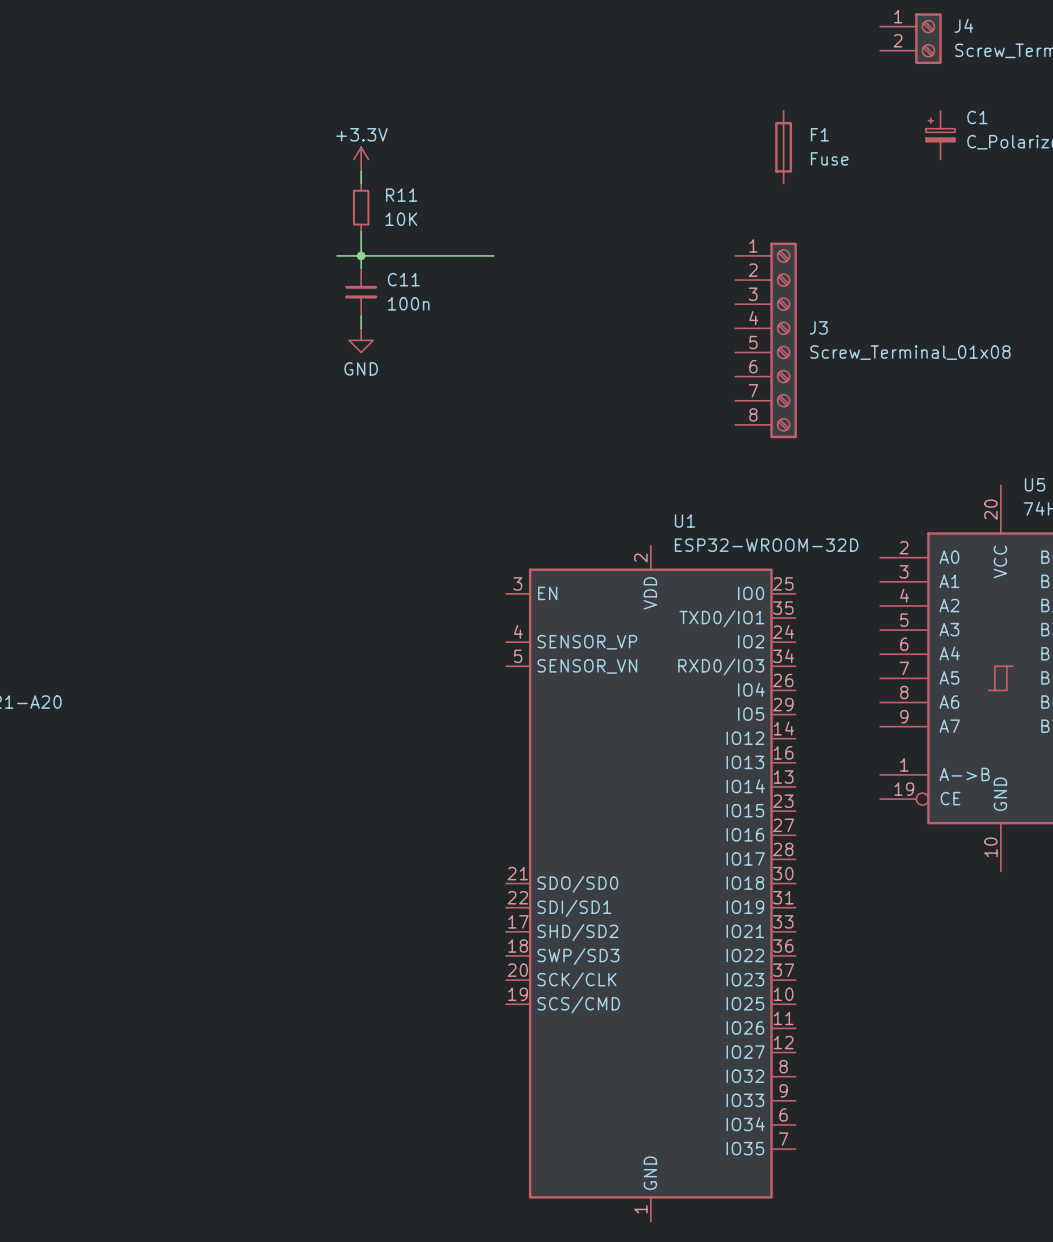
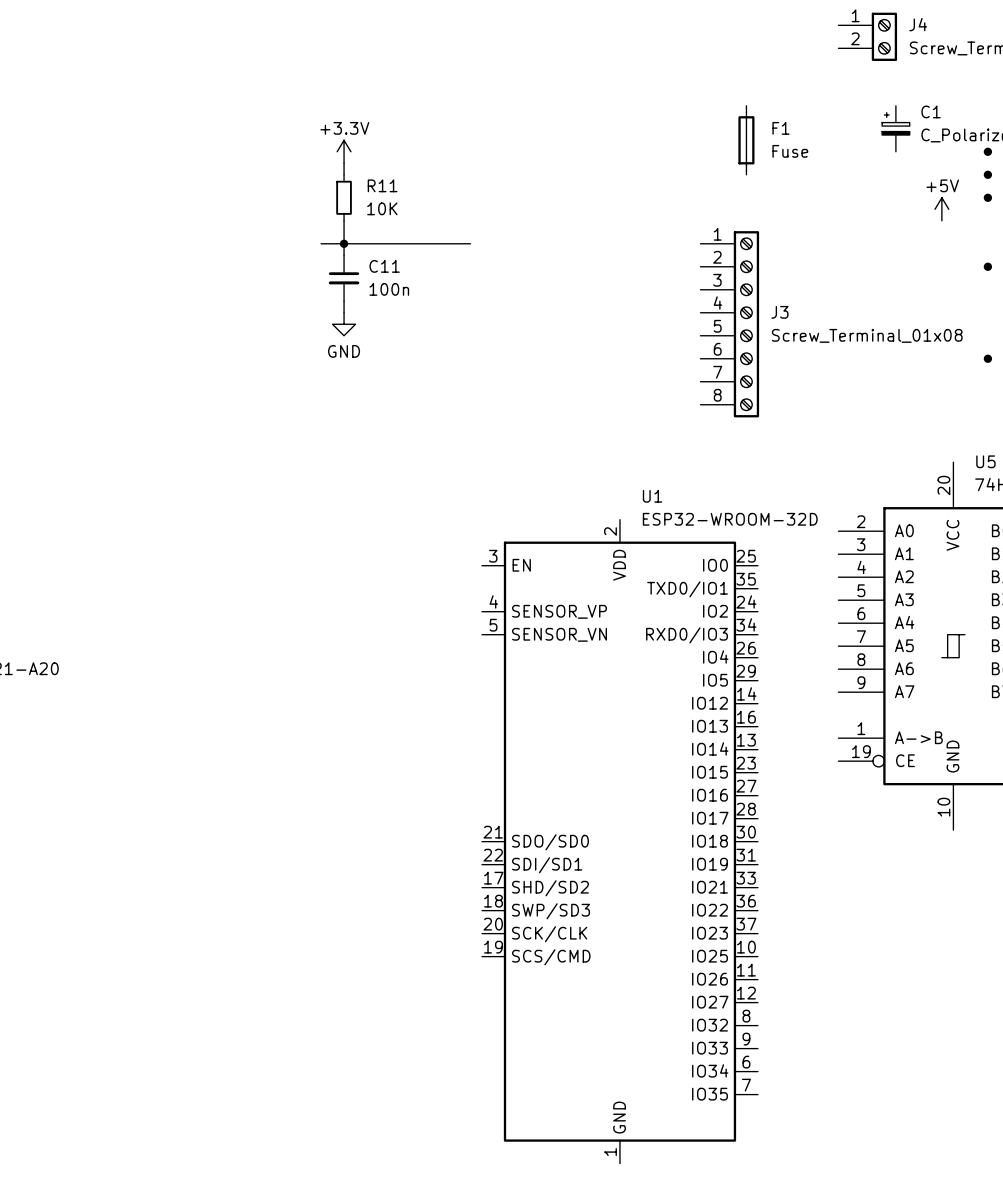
junction: none -> (987, 151)
junction: none -> (987, 174)
junction: none -> (987, 197)
power symbol: none -> +5V (941, 209)
junction: none -> (987, 266)
junction: none -> (987, 358)

